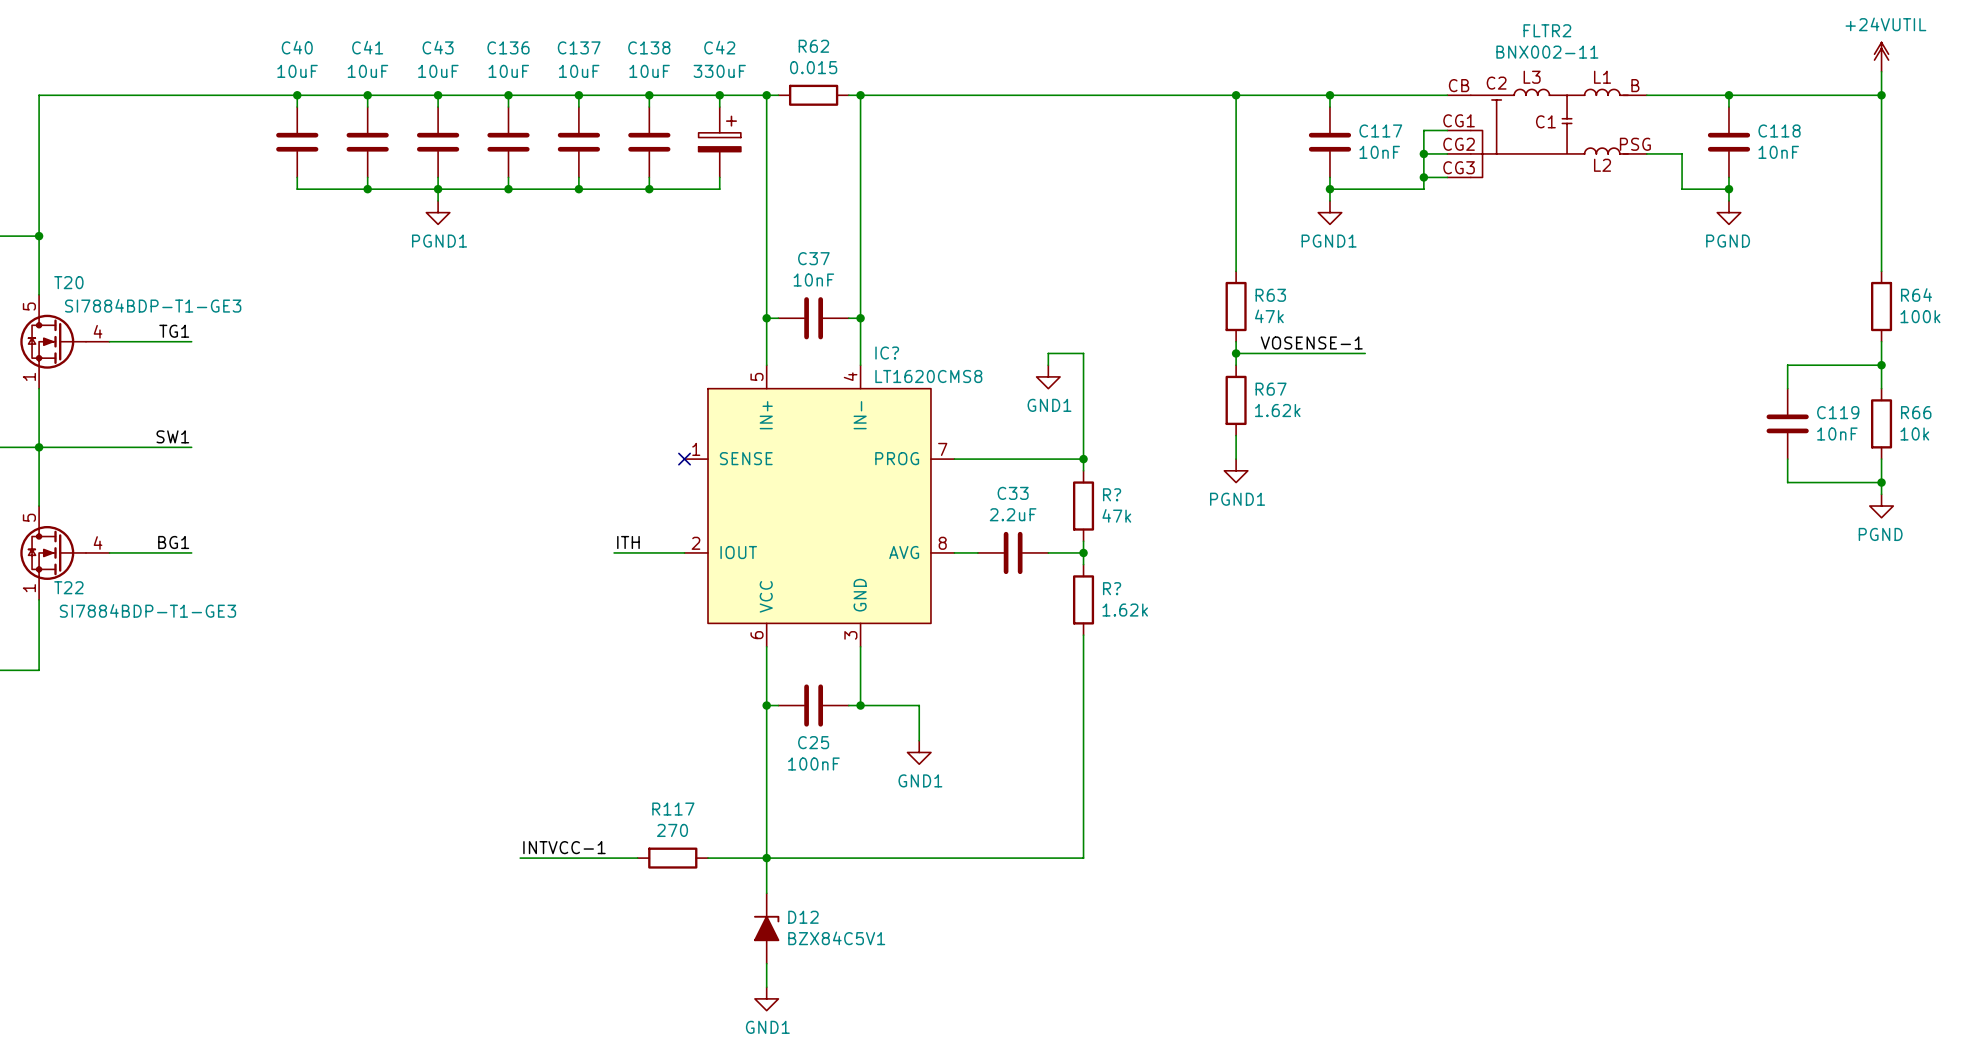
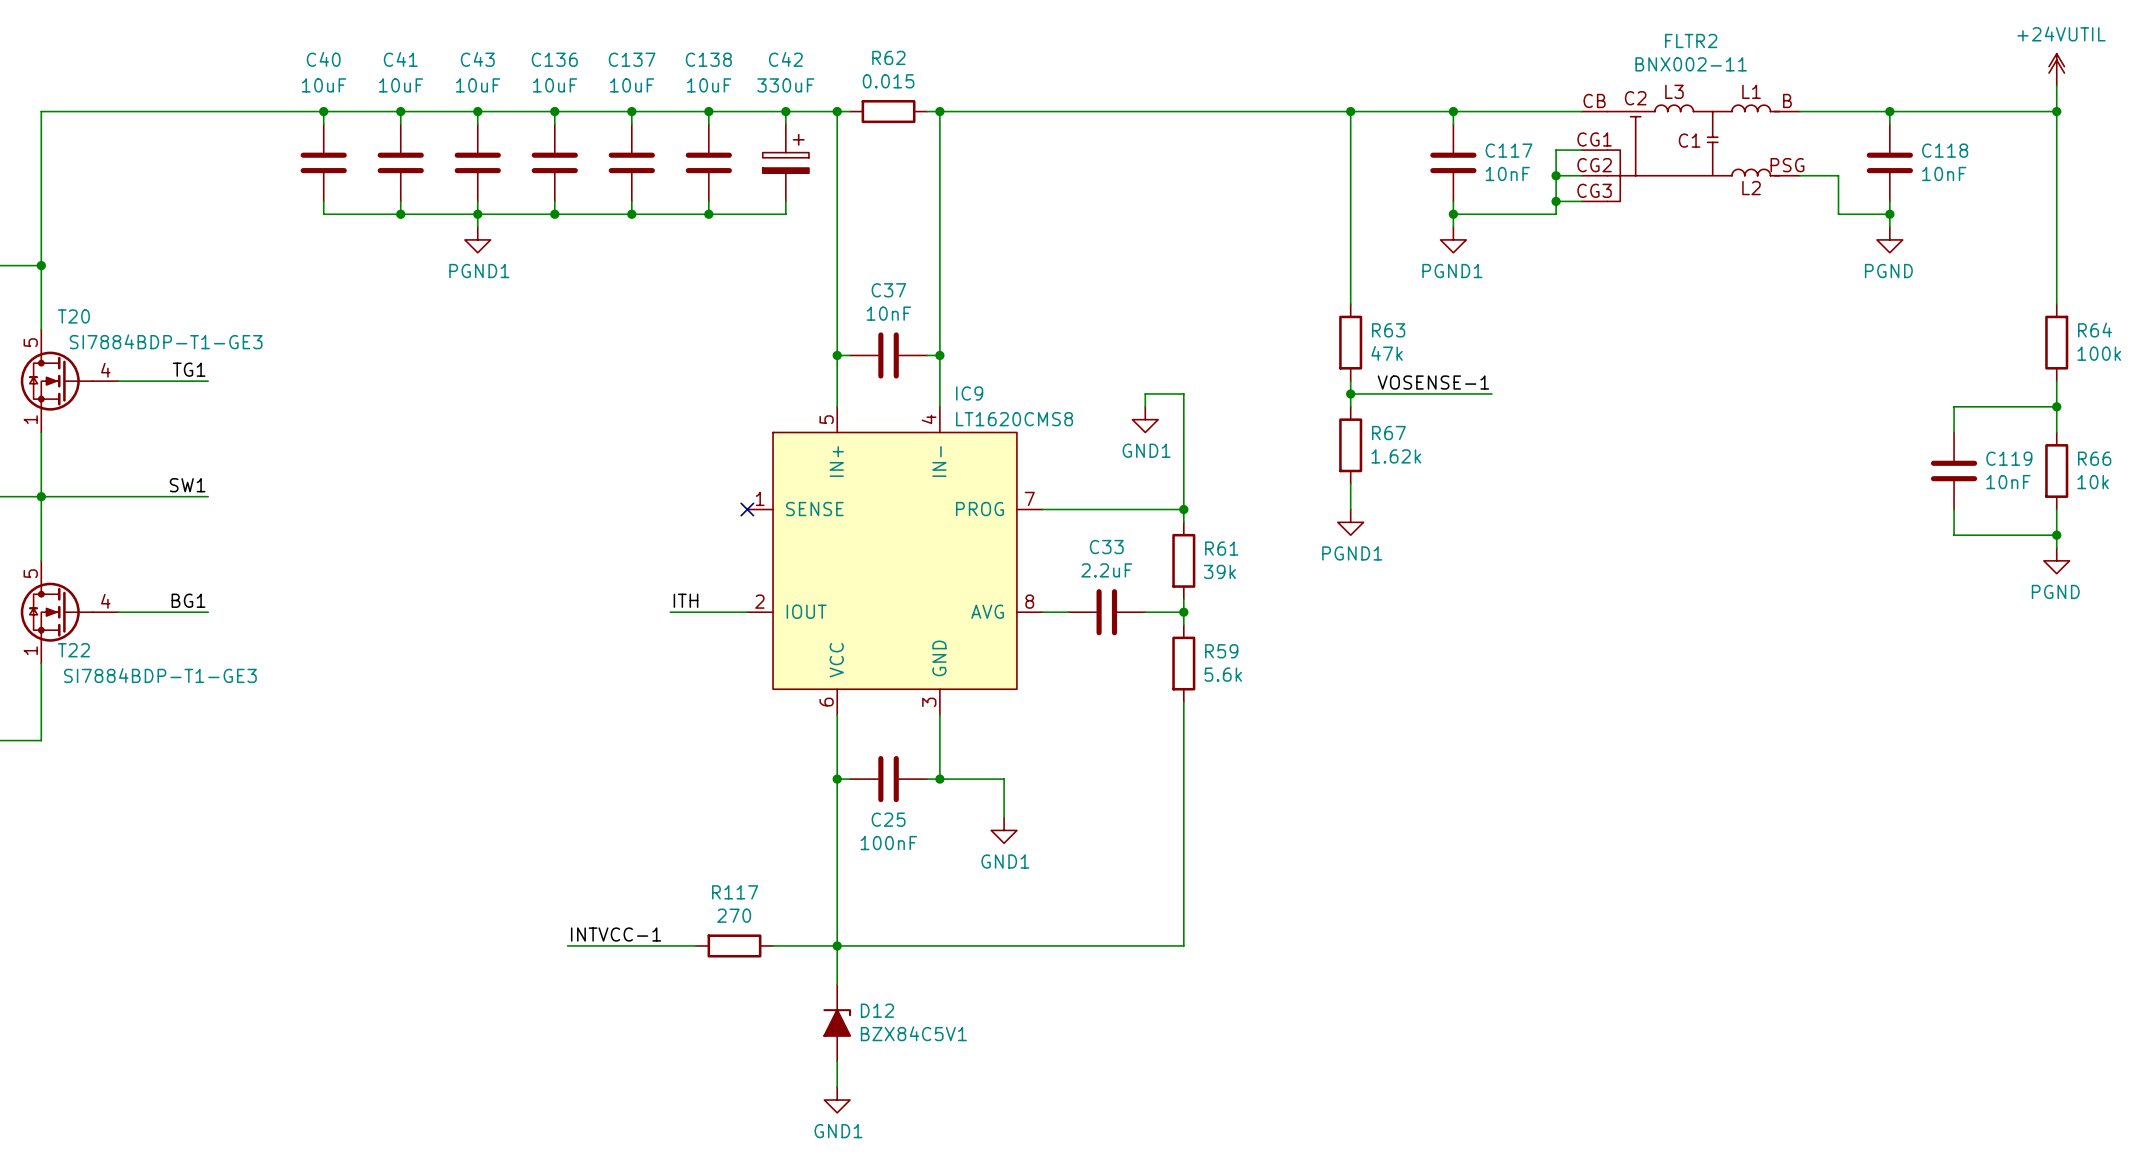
IC? name: IC? (887, 353) -> IC9 (969, 393)
R? name: R? (1112, 494) -> R61 (1221, 548)
R? value: 47k (1116, 515) -> 39k (1219, 571)
R? name: R? (1112, 588) -> R59 (1221, 651)
R? value: 1.62k (1125, 610) -> 5.6k (1223, 674)

